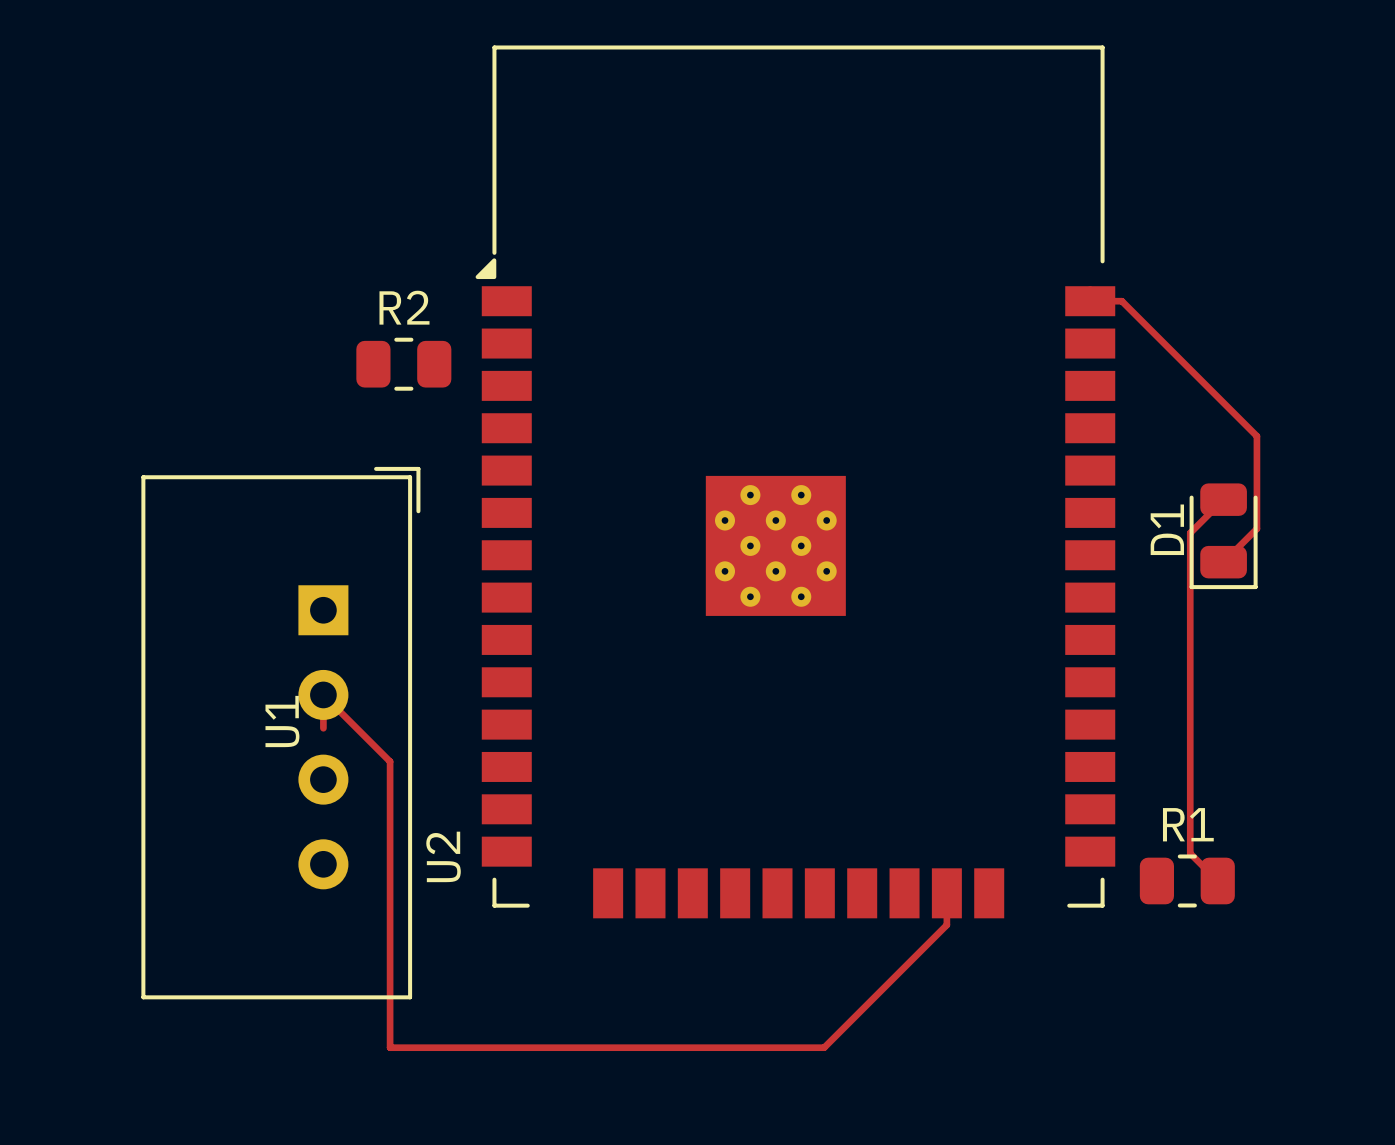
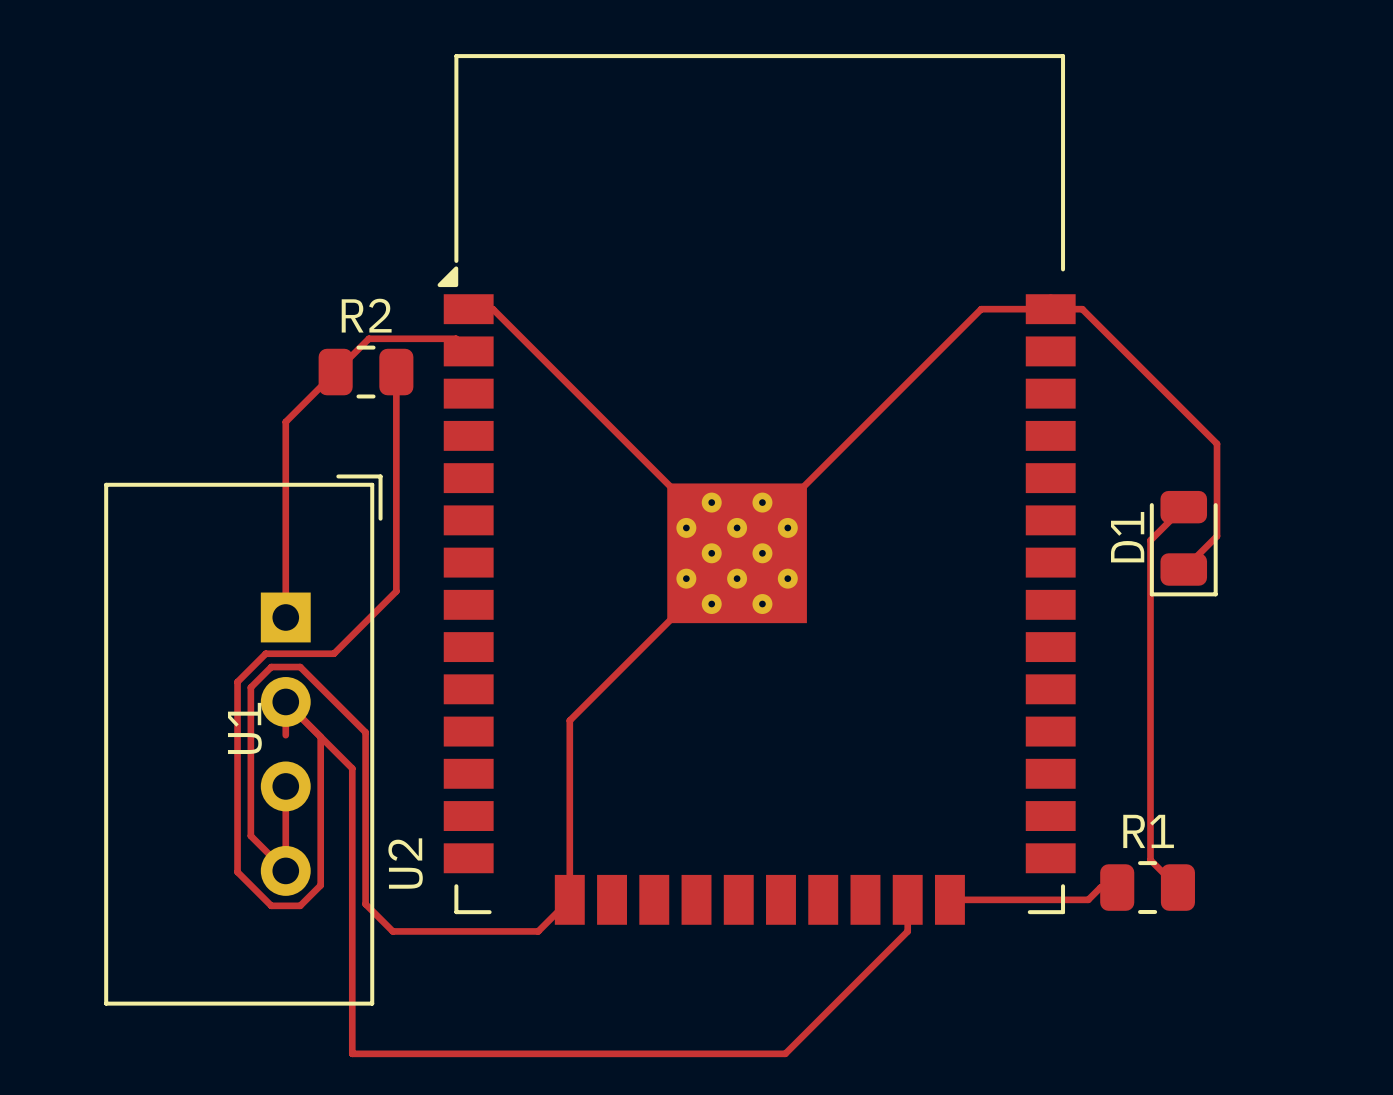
track: none -> (468, 309) (492, 309) (686, 502)
track: none -> (1050, 309) (981, 309) (787, 502)
track: none -> (468, 351) (456, 338) (368, 338) (285, 421) (285, 617)
track: none -> (396, 372) (396, 591) (333, 653) (265, 653) (237, 681) (237, 872) (271, 905) (300, 905) (320, 885) (320, 736)
track: none -> (686, 604) (569, 720) (569, 899) (538, 931) (392, 931) (365, 904) (365, 732) (300, 667) (271, 667) (250, 687) (250, 835) (285, 870) (285, 786)
track: none -> (1117, 887) (1100, 887) (1088, 899) (949, 899)

